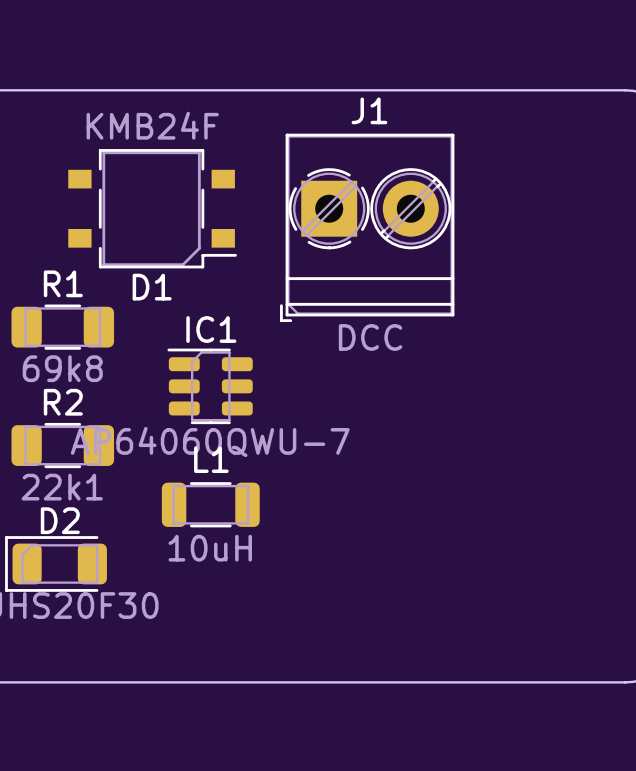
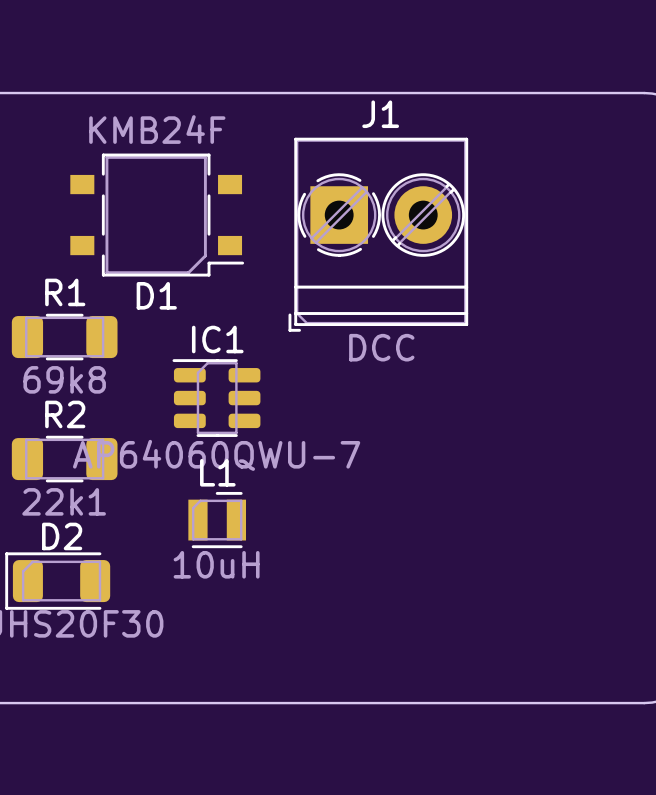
L1 footprint: [161, 482, 260, 528] -> [188, 491, 247, 549]

